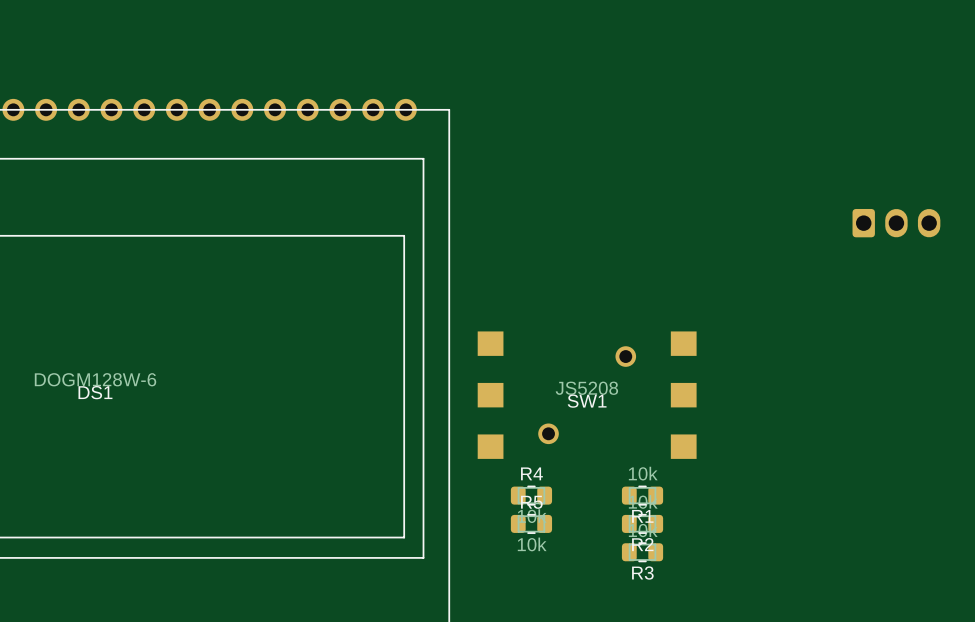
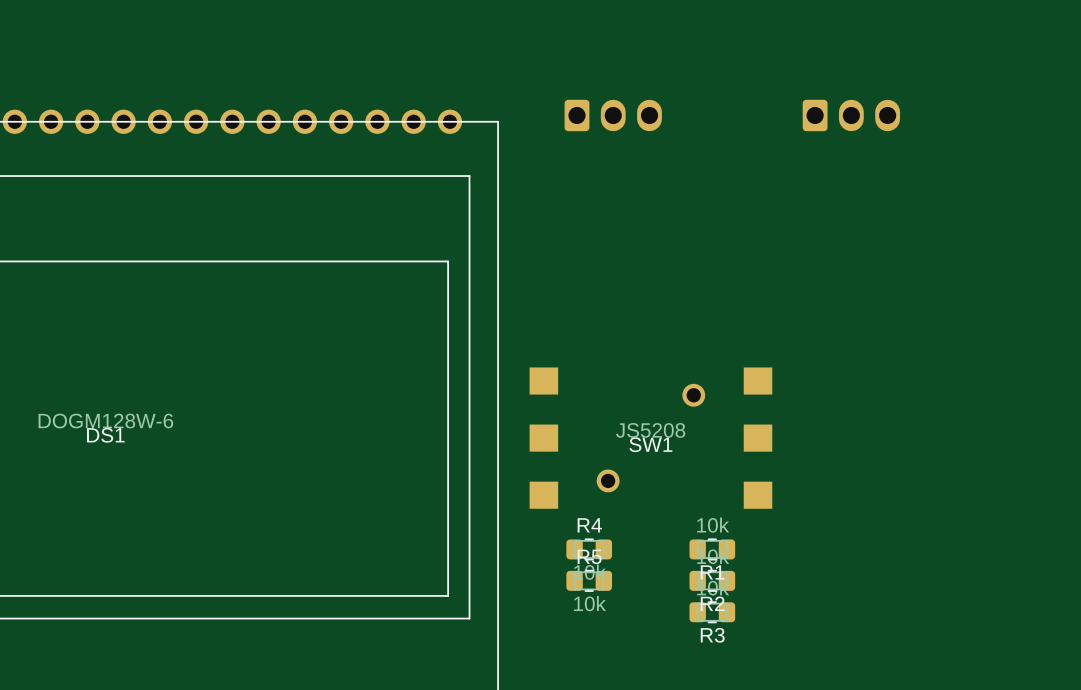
part: none -> (613, 115)
part position: (896, 223) -> (851, 115)

